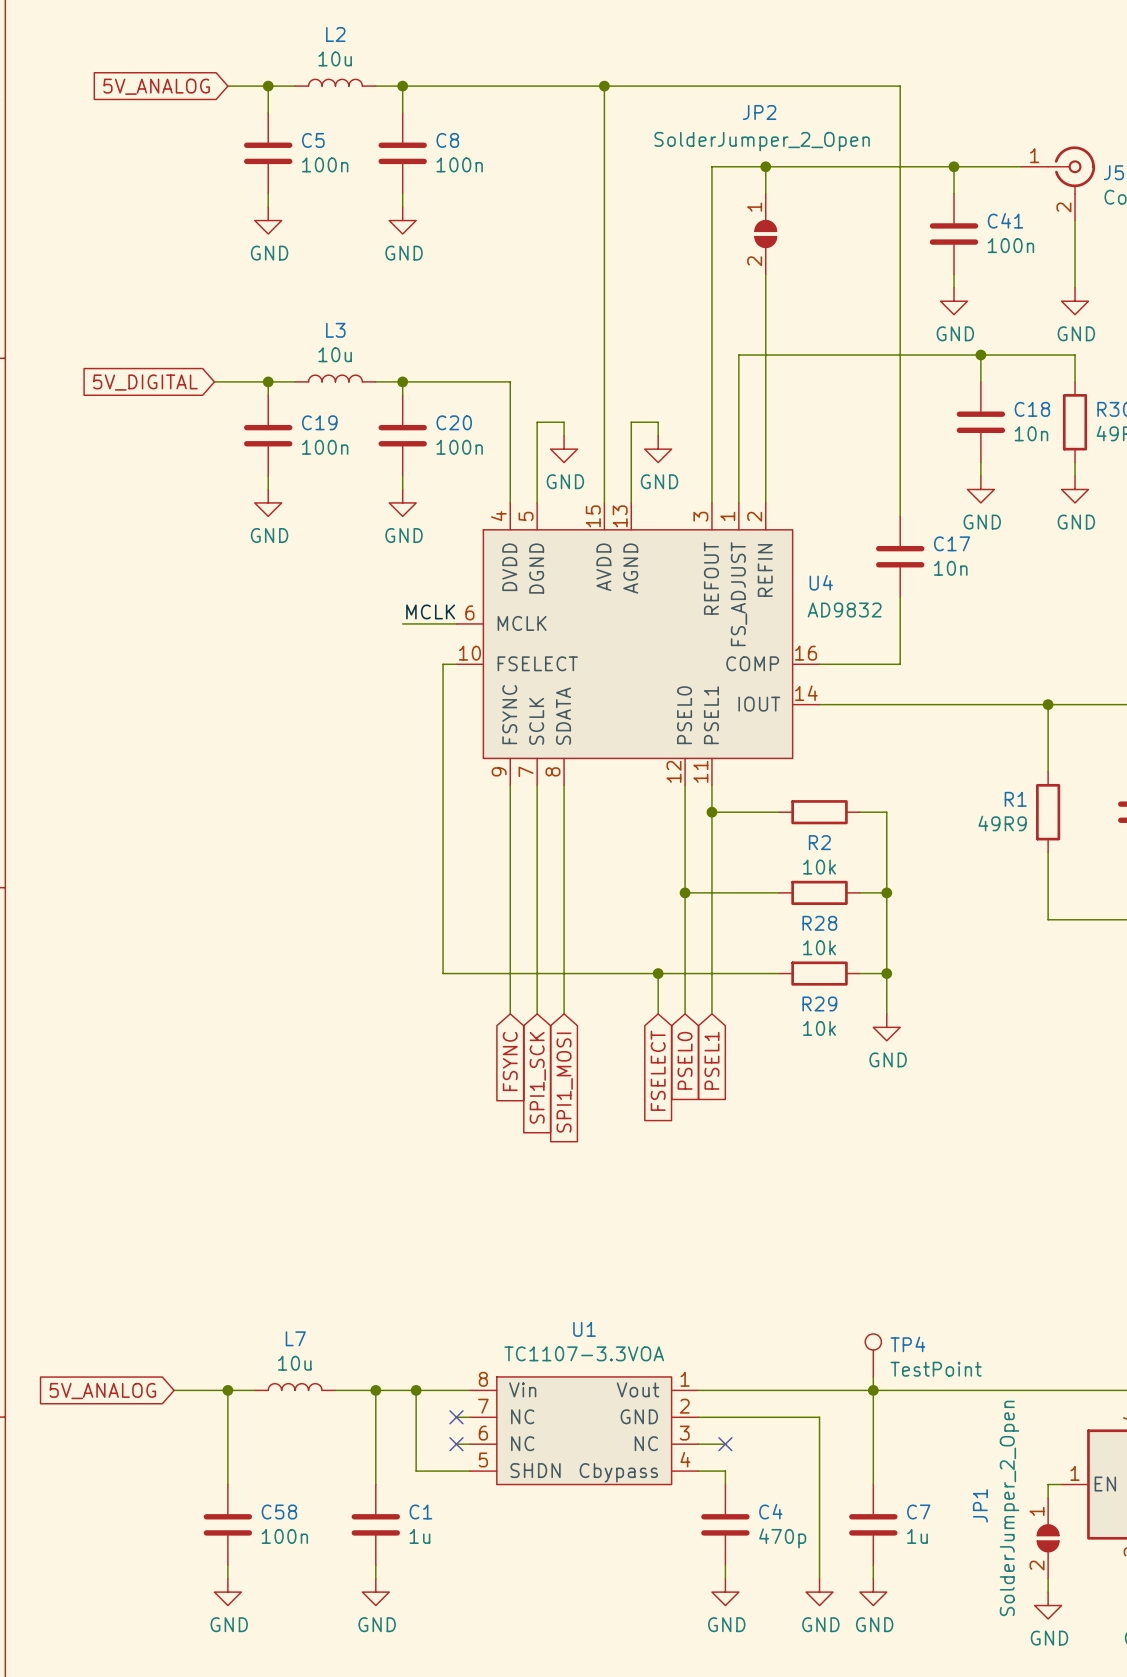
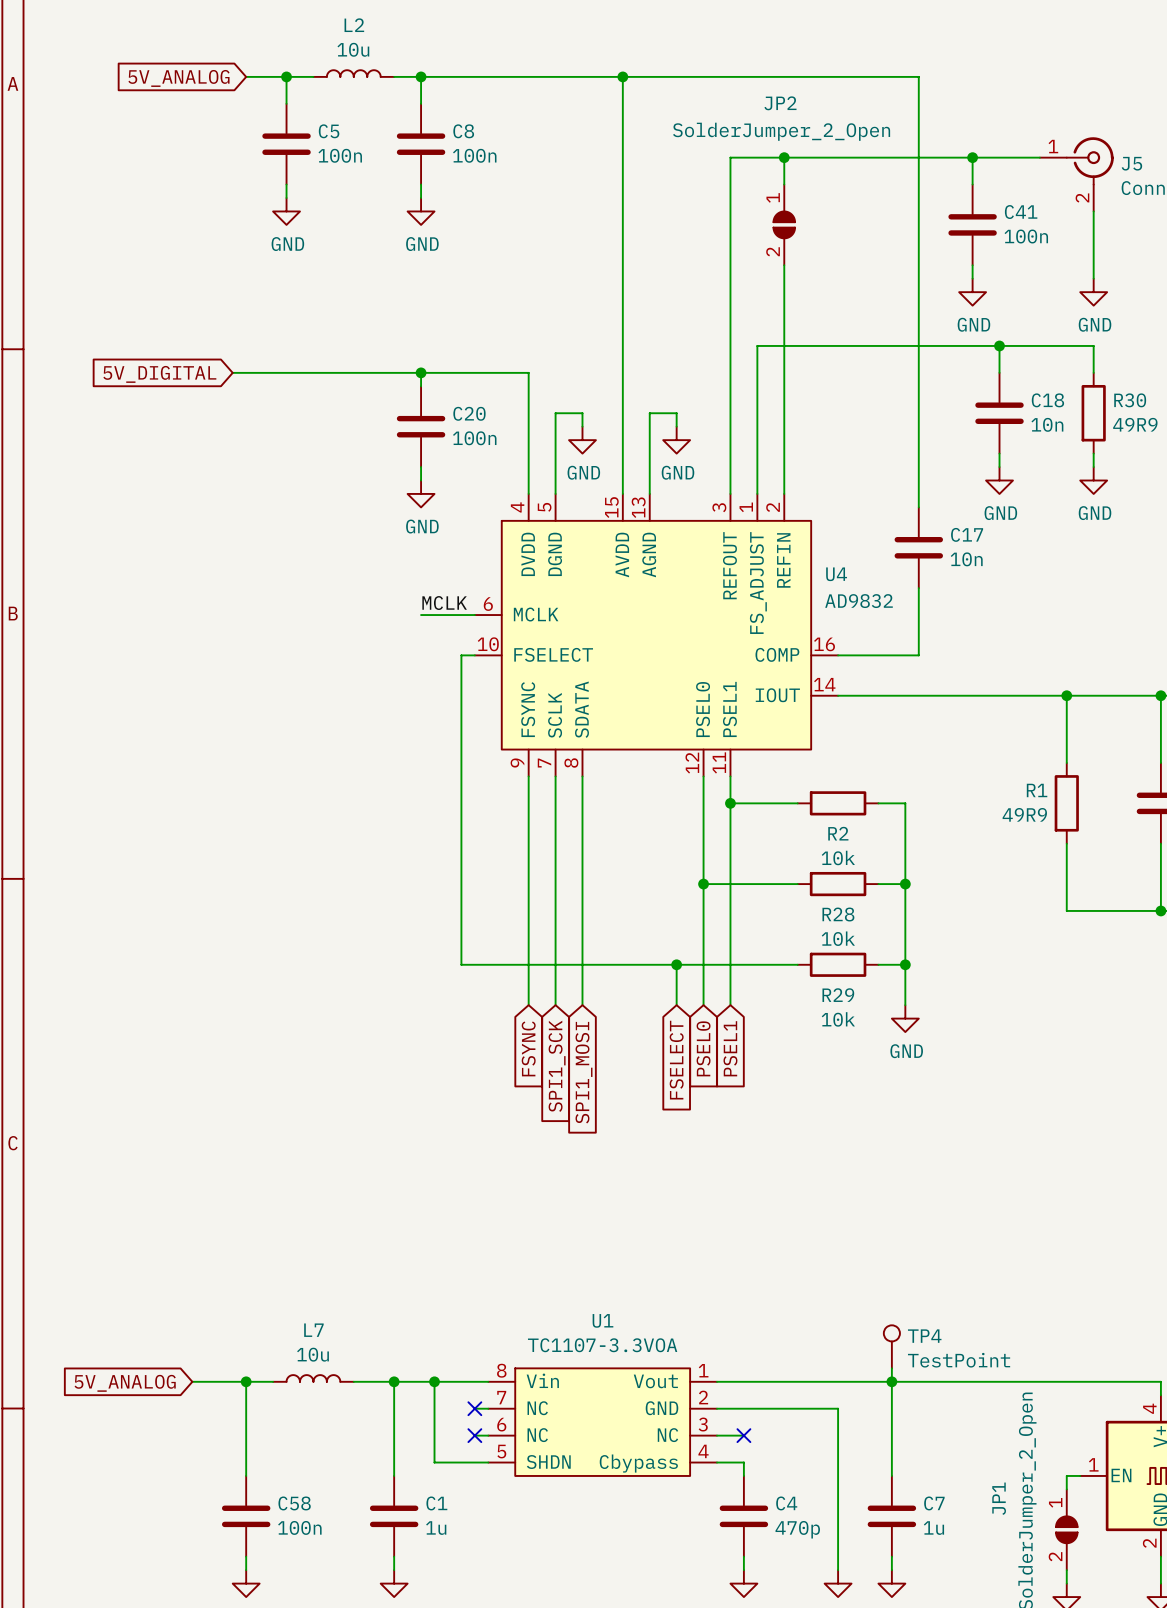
L3: 10u (335, 378) -> none
wire: (268, 381) (268, 395) -> none
junction: (268, 381) -> none
wire: none -> (313, 372) (394, 372)
C19: 100n (268, 435) -> none
wire: (268, 476) (268, 489) -> none
power symbol: GND (268, 502) -> none

